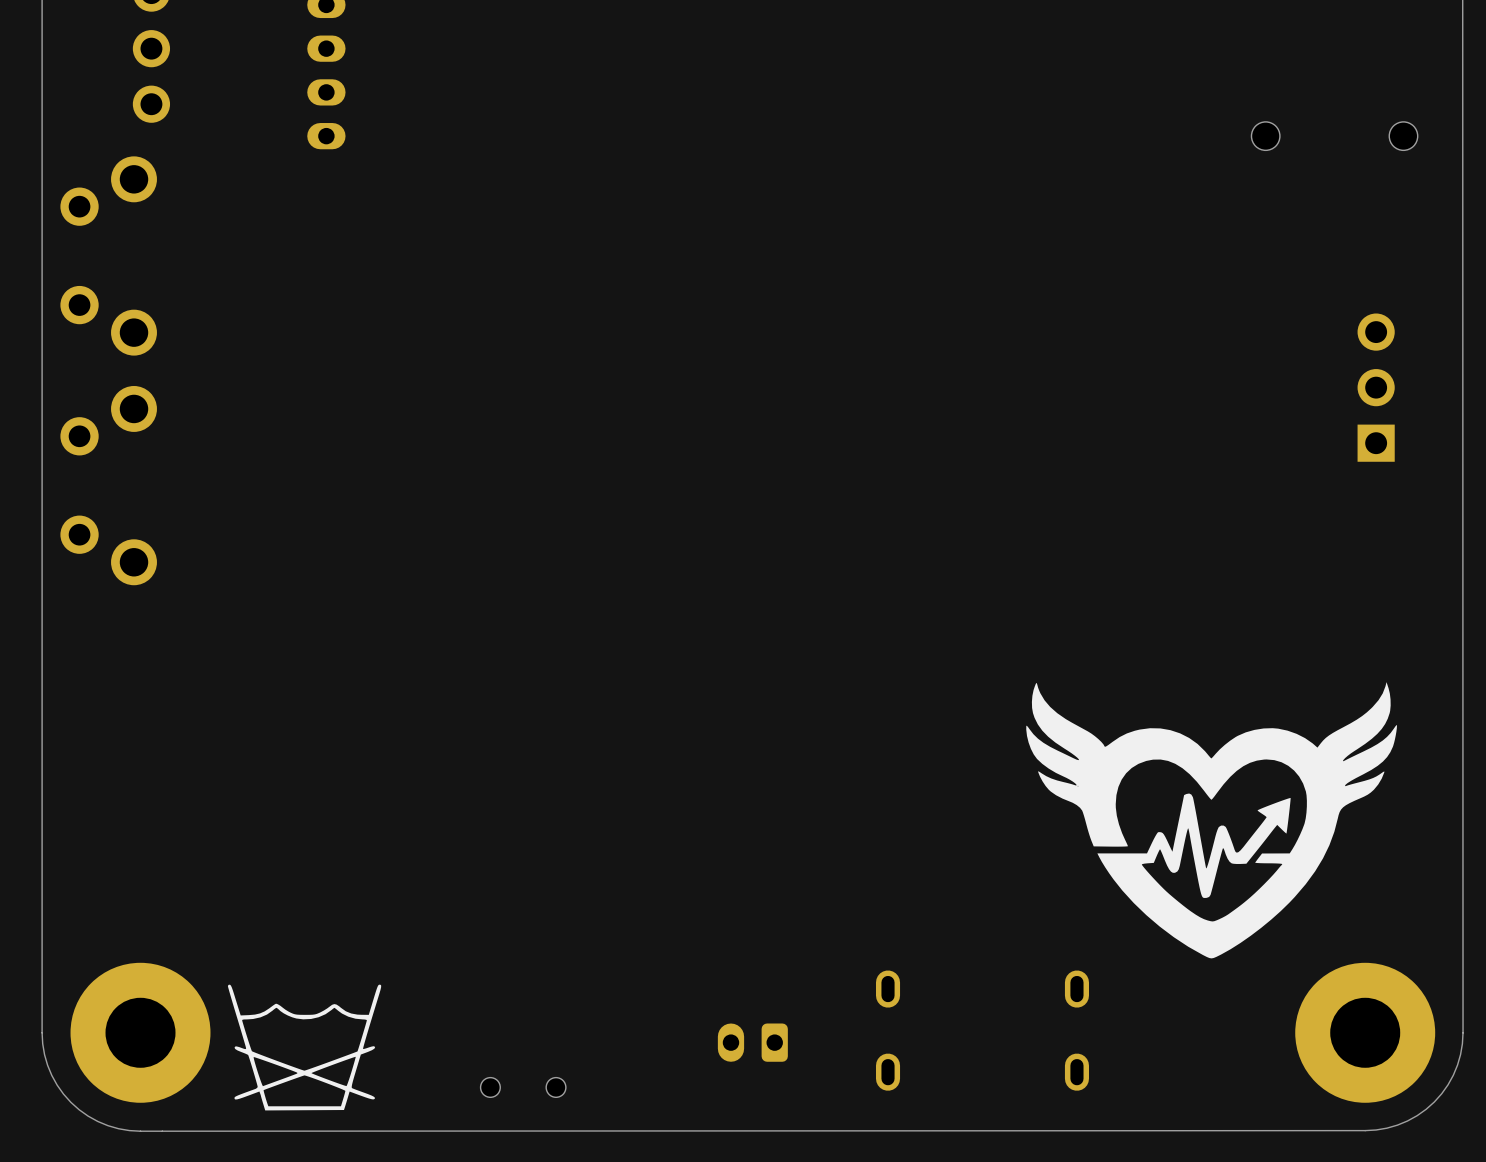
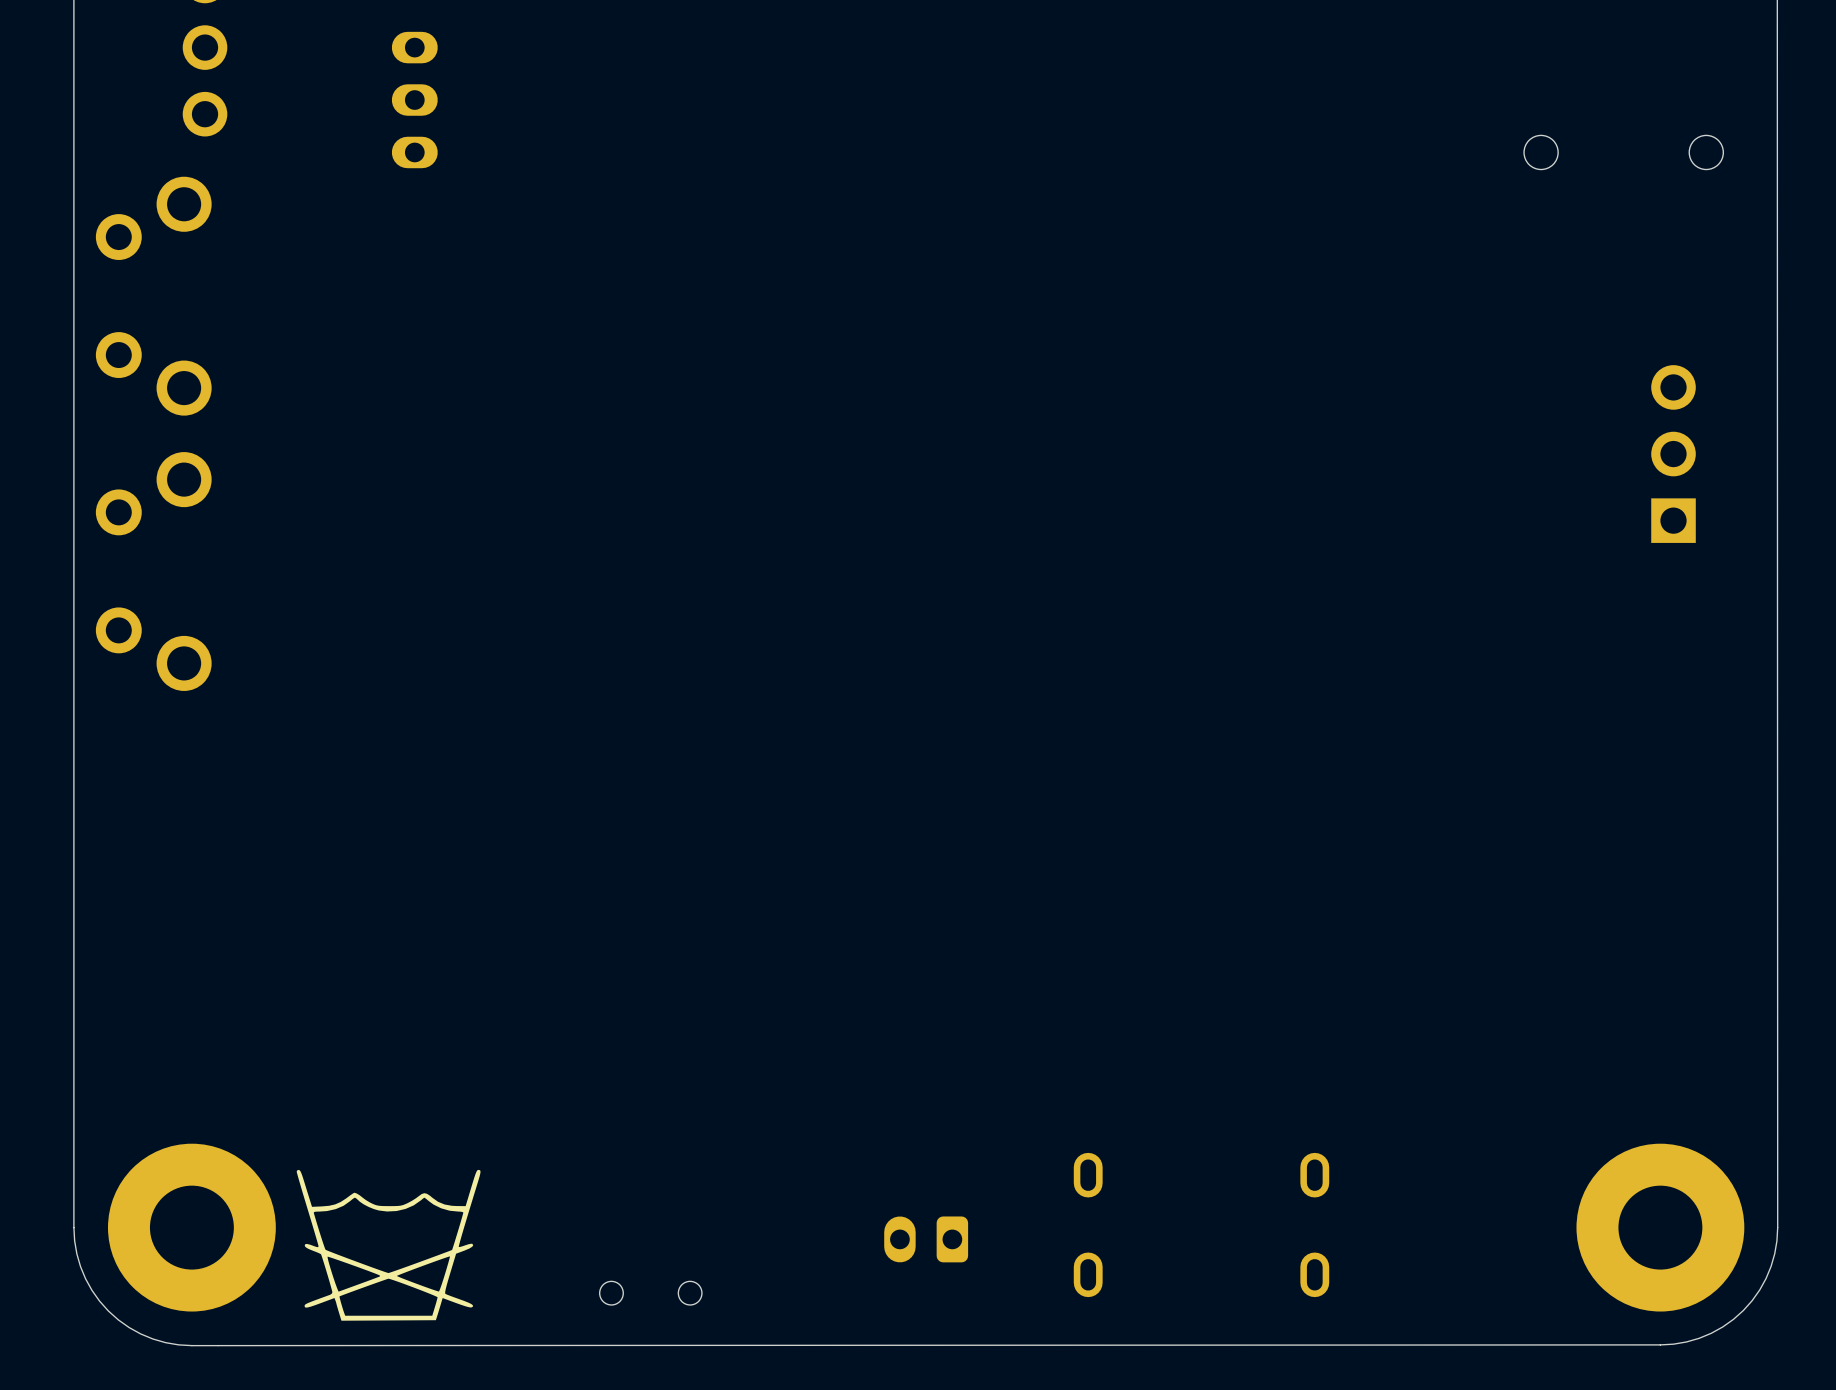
drawing: [1026, 682, 1397, 959] -> none

